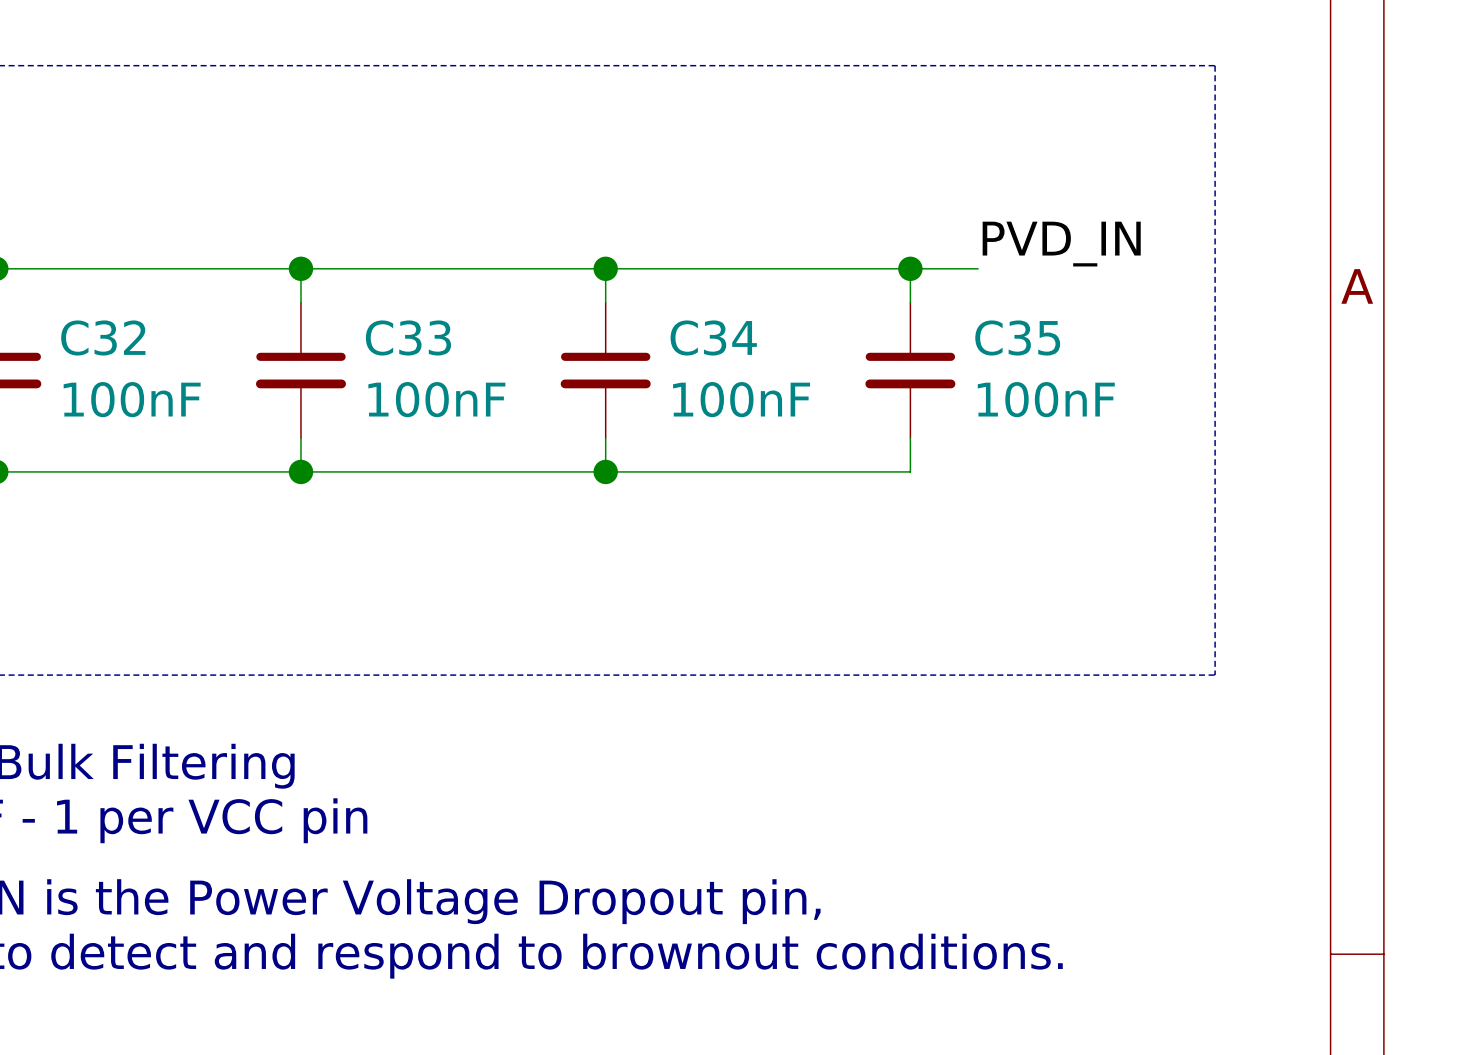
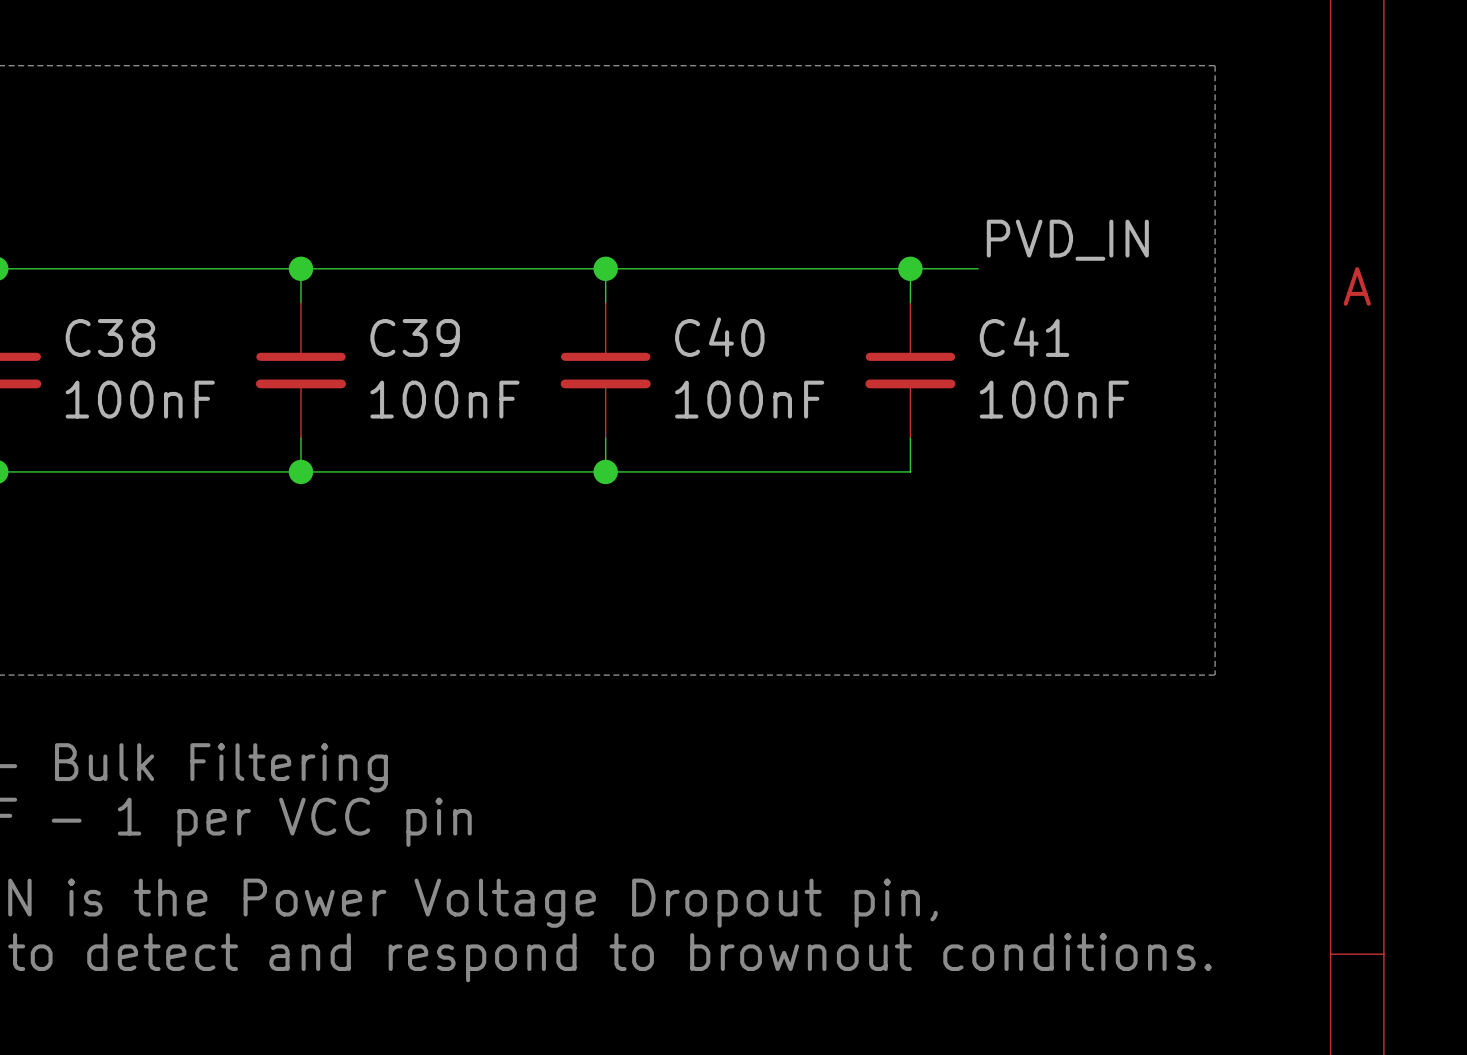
C32 name: C32 (103, 337) -> C38 (110, 337)
C33 name: C33 (408, 337) -> C39 (415, 337)
C34 name: C34 (713, 337) -> C40 (719, 337)
C35 name: C35 (1017, 337) -> C41 (1024, 337)

